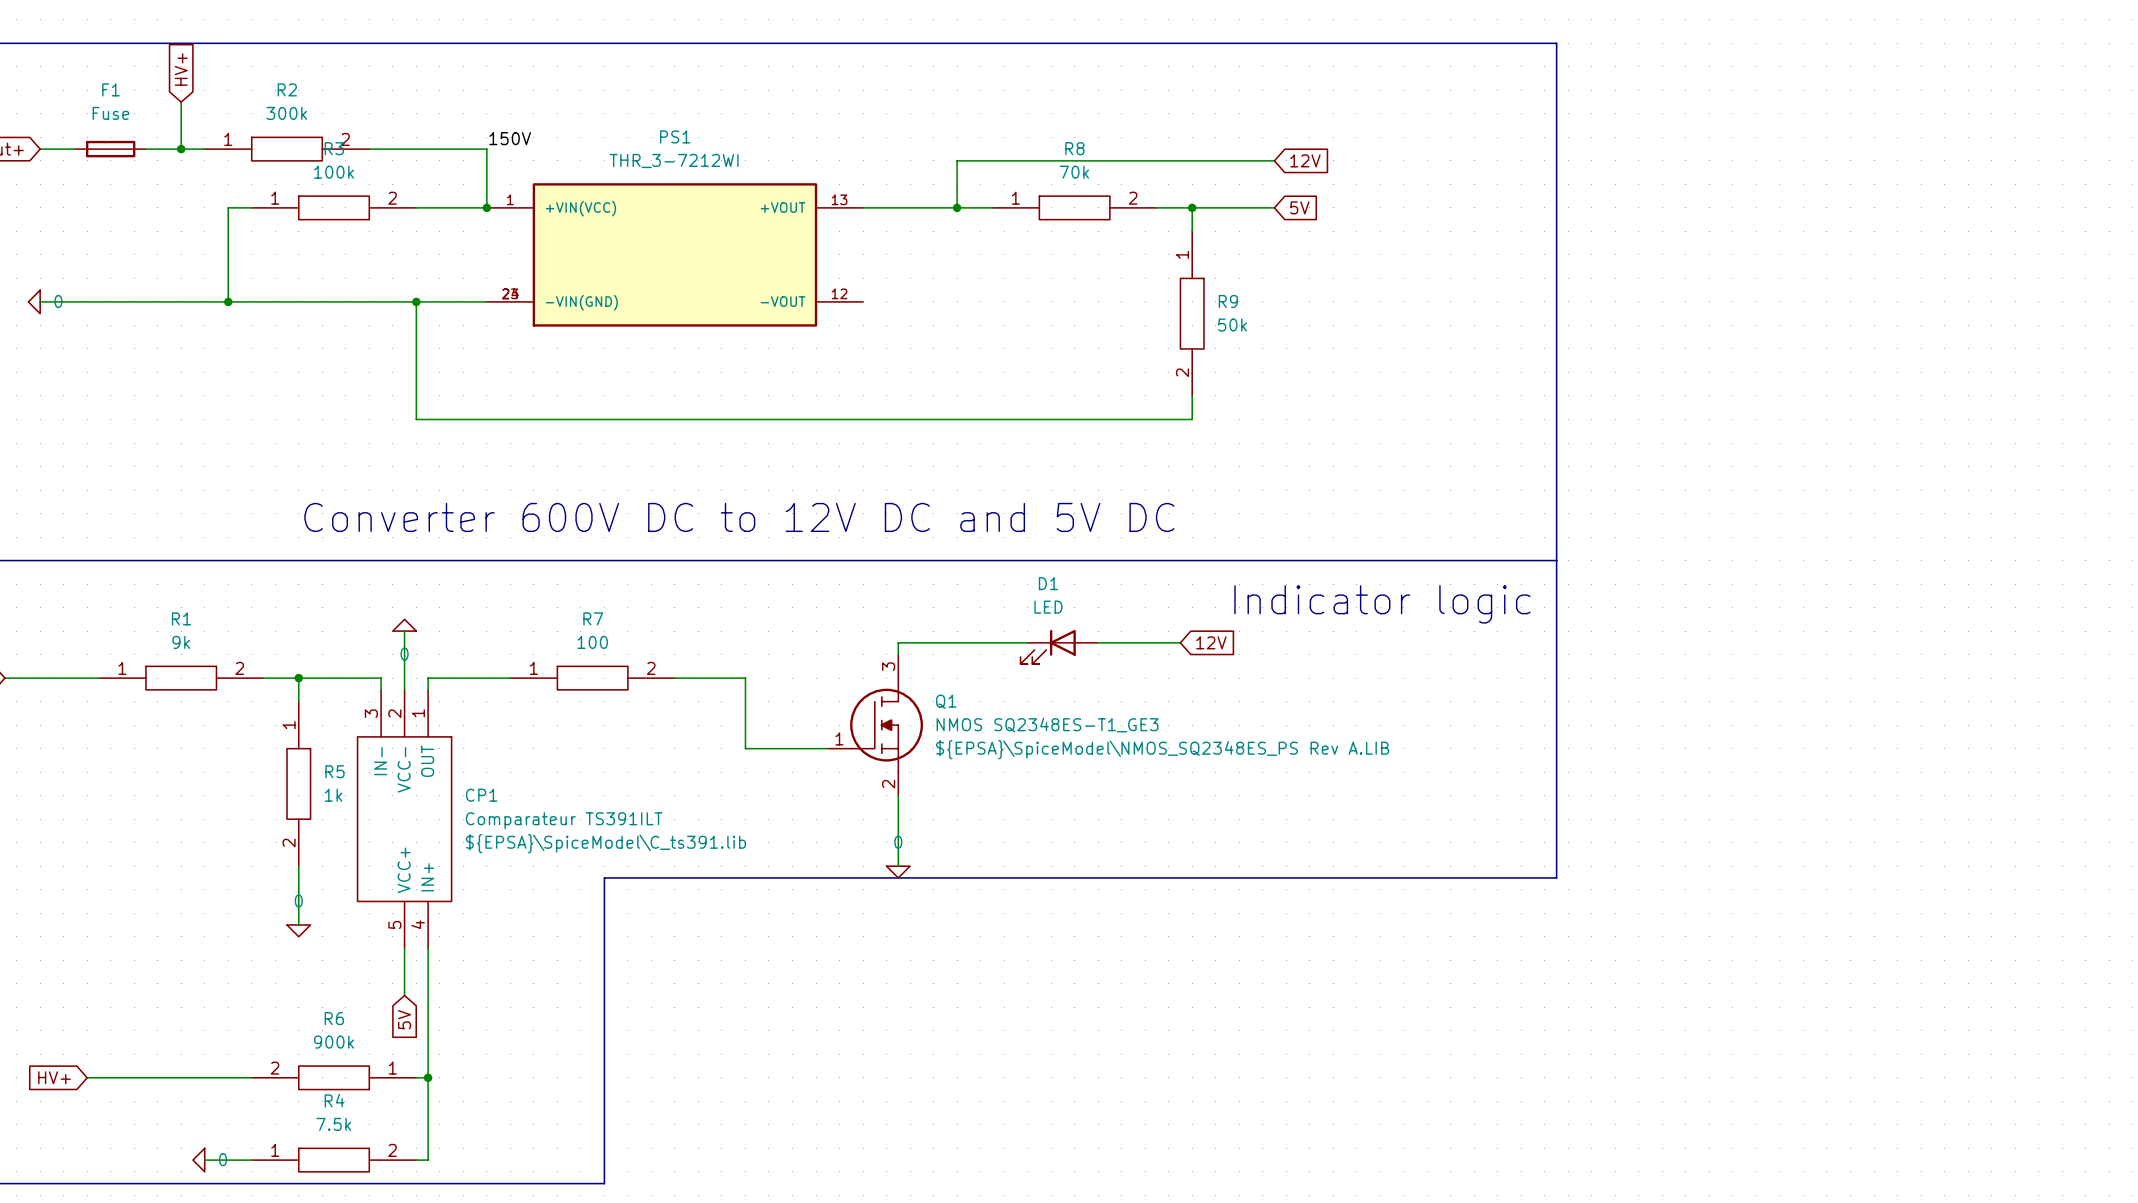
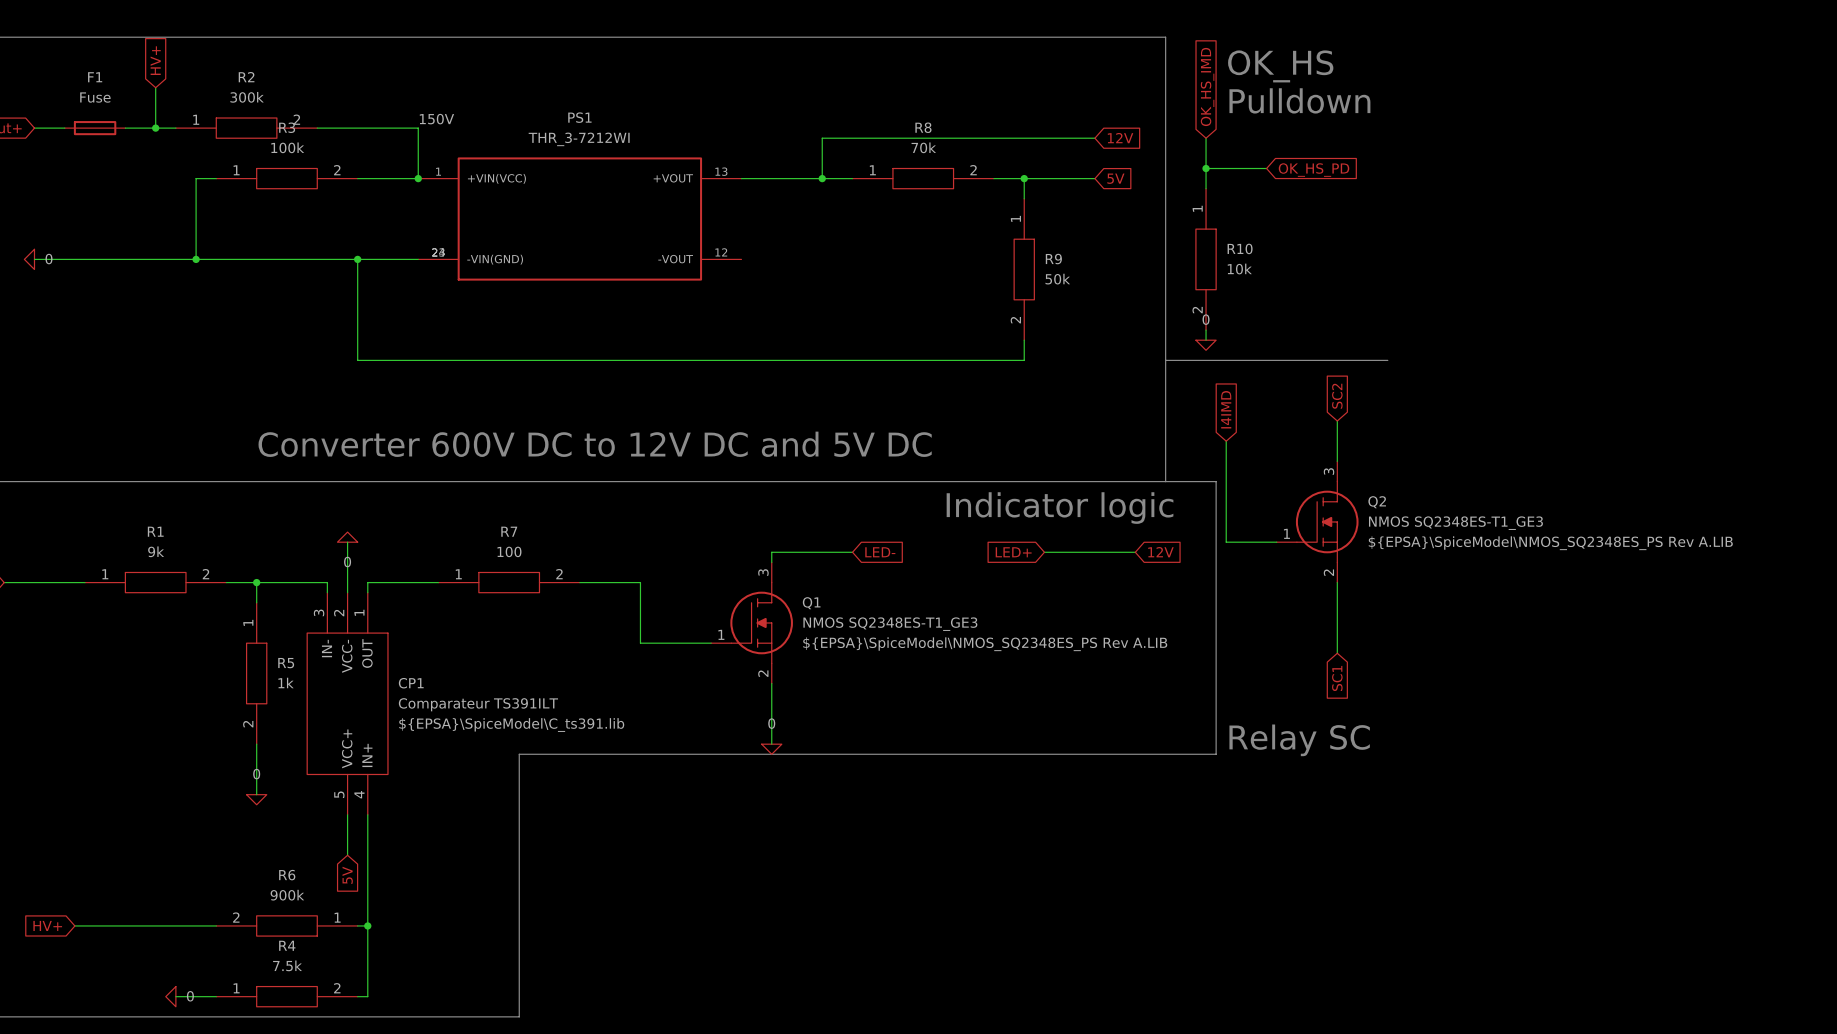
line: (1356, 43) (1556, 43) (1556, 877) (1415, 877) -> (1165, 37) (1165, 481)
text: none -> OK_HS (1280, 66)
global label: none -> OK_HS_IMD (1207, 86)
text: none -> Pulldown (1299, 100)
wire: none -> (1206, 138) (1206, 188)
wire: none -> (1206, 168) (1266, 168)
junction: none -> (1206, 168)
global label: none -> OK_HS_PD (1314, 170)
R10: none -> (1206, 259)
wire: none -> (1206, 330) (1206, 340)
power symbol: none -> 0 (1206, 345)
line: none -> (1165, 360) (1387, 360)
global label: none -> SC2 (1337, 396)
global label: none -> I4IMD (1226, 409)
wire: none -> (1226, 441) (1226, 542) (1276, 542)
line: (1415, 560) (1556, 560) -> (1216, 481) (1216, 754)
text position: Indicator logic (1382, 604) -> Indicator logic (1060, 508)
Q2: none -> NMOS SQ2348ES-T1_GE3 (1317, 521)
wire: (992, 642) (1027, 642) -> none
global label: none -> LED- (880, 552)
wire: (1098, 642) (1180, 642) -> none
global label: none -> LED+ (1013, 552)
global label position: 12V (1211, 642) -> 12V (1160, 552)
wire: none -> (1044, 552) (1135, 552)
D1: LED (1059, 646) -> none
global label: none -> SC1 (1337, 678)
text: none -> Relay SC (1299, 740)

